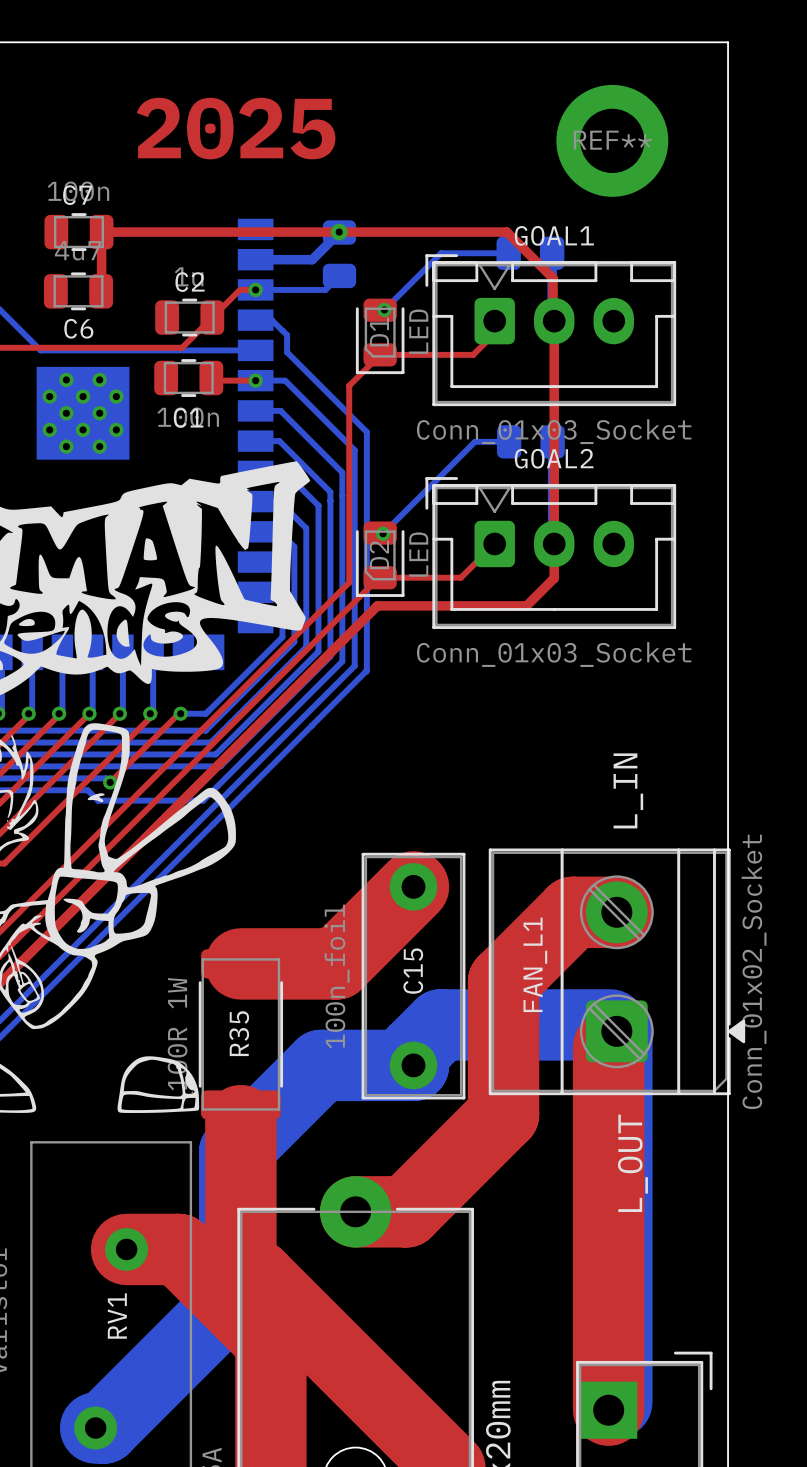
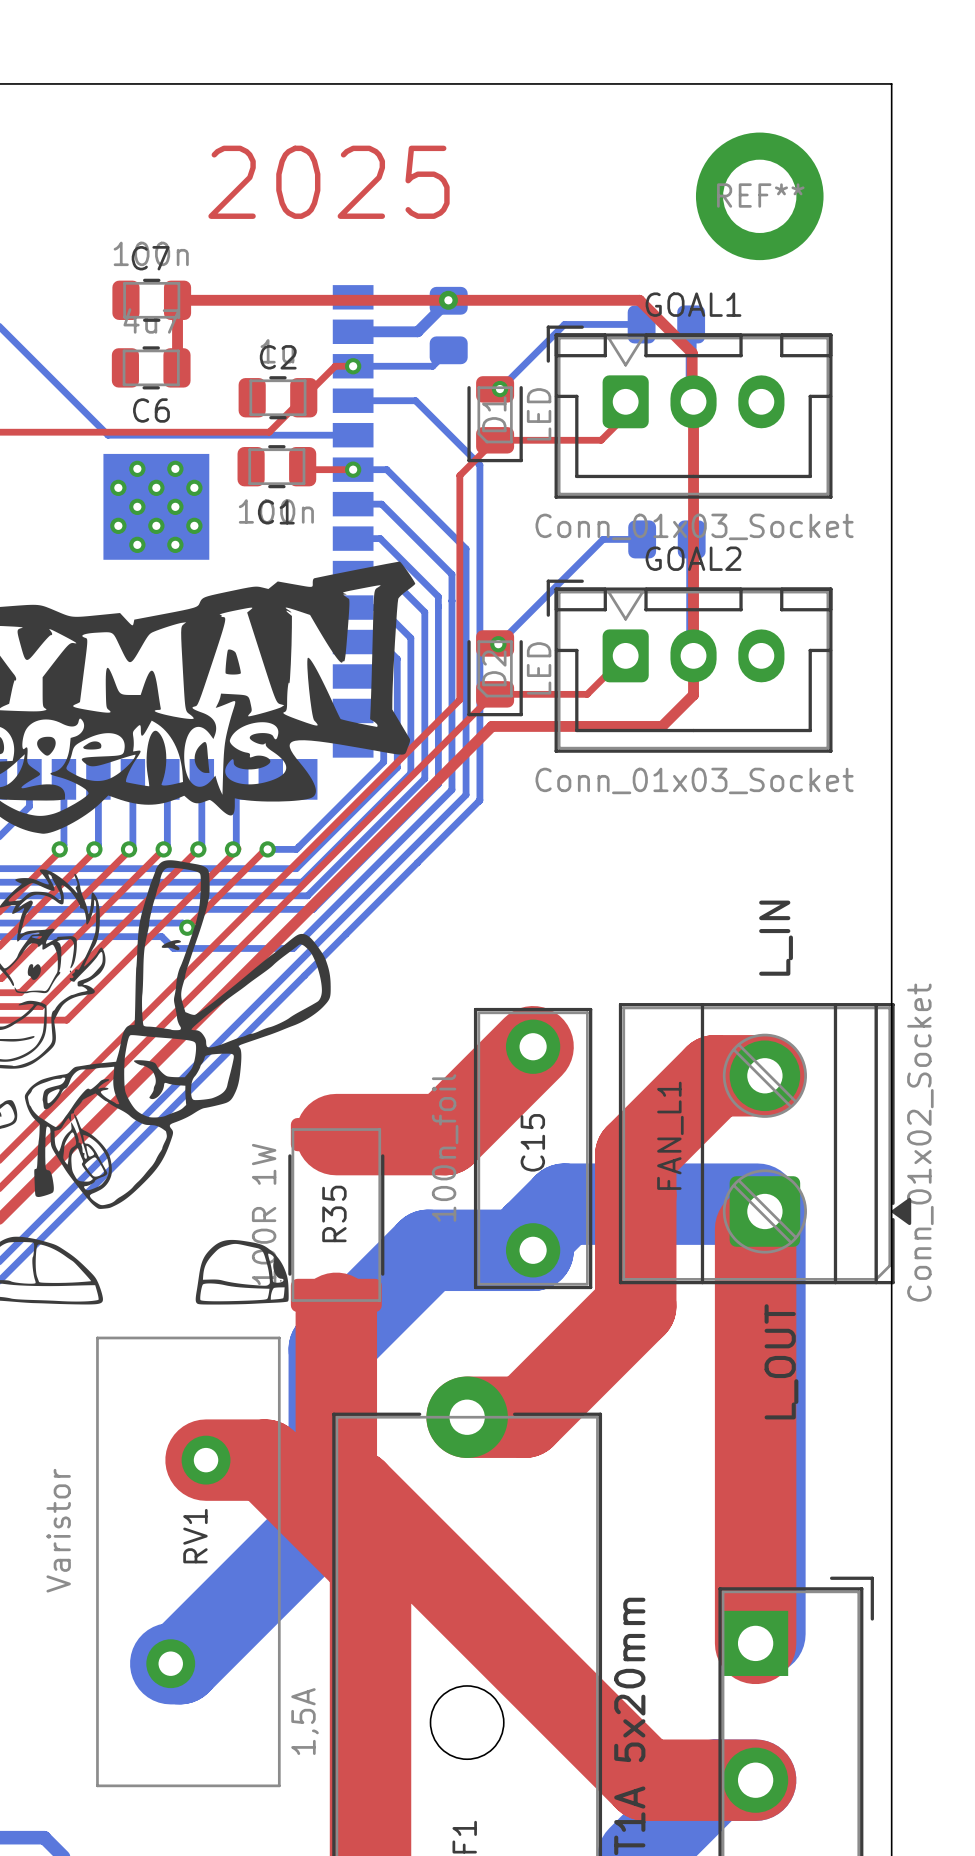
bottom track: (271, 320) (287, 335) (287, 352) (366, 432) -> (371, 400) (415, 400) (479, 465) (479, 528)

